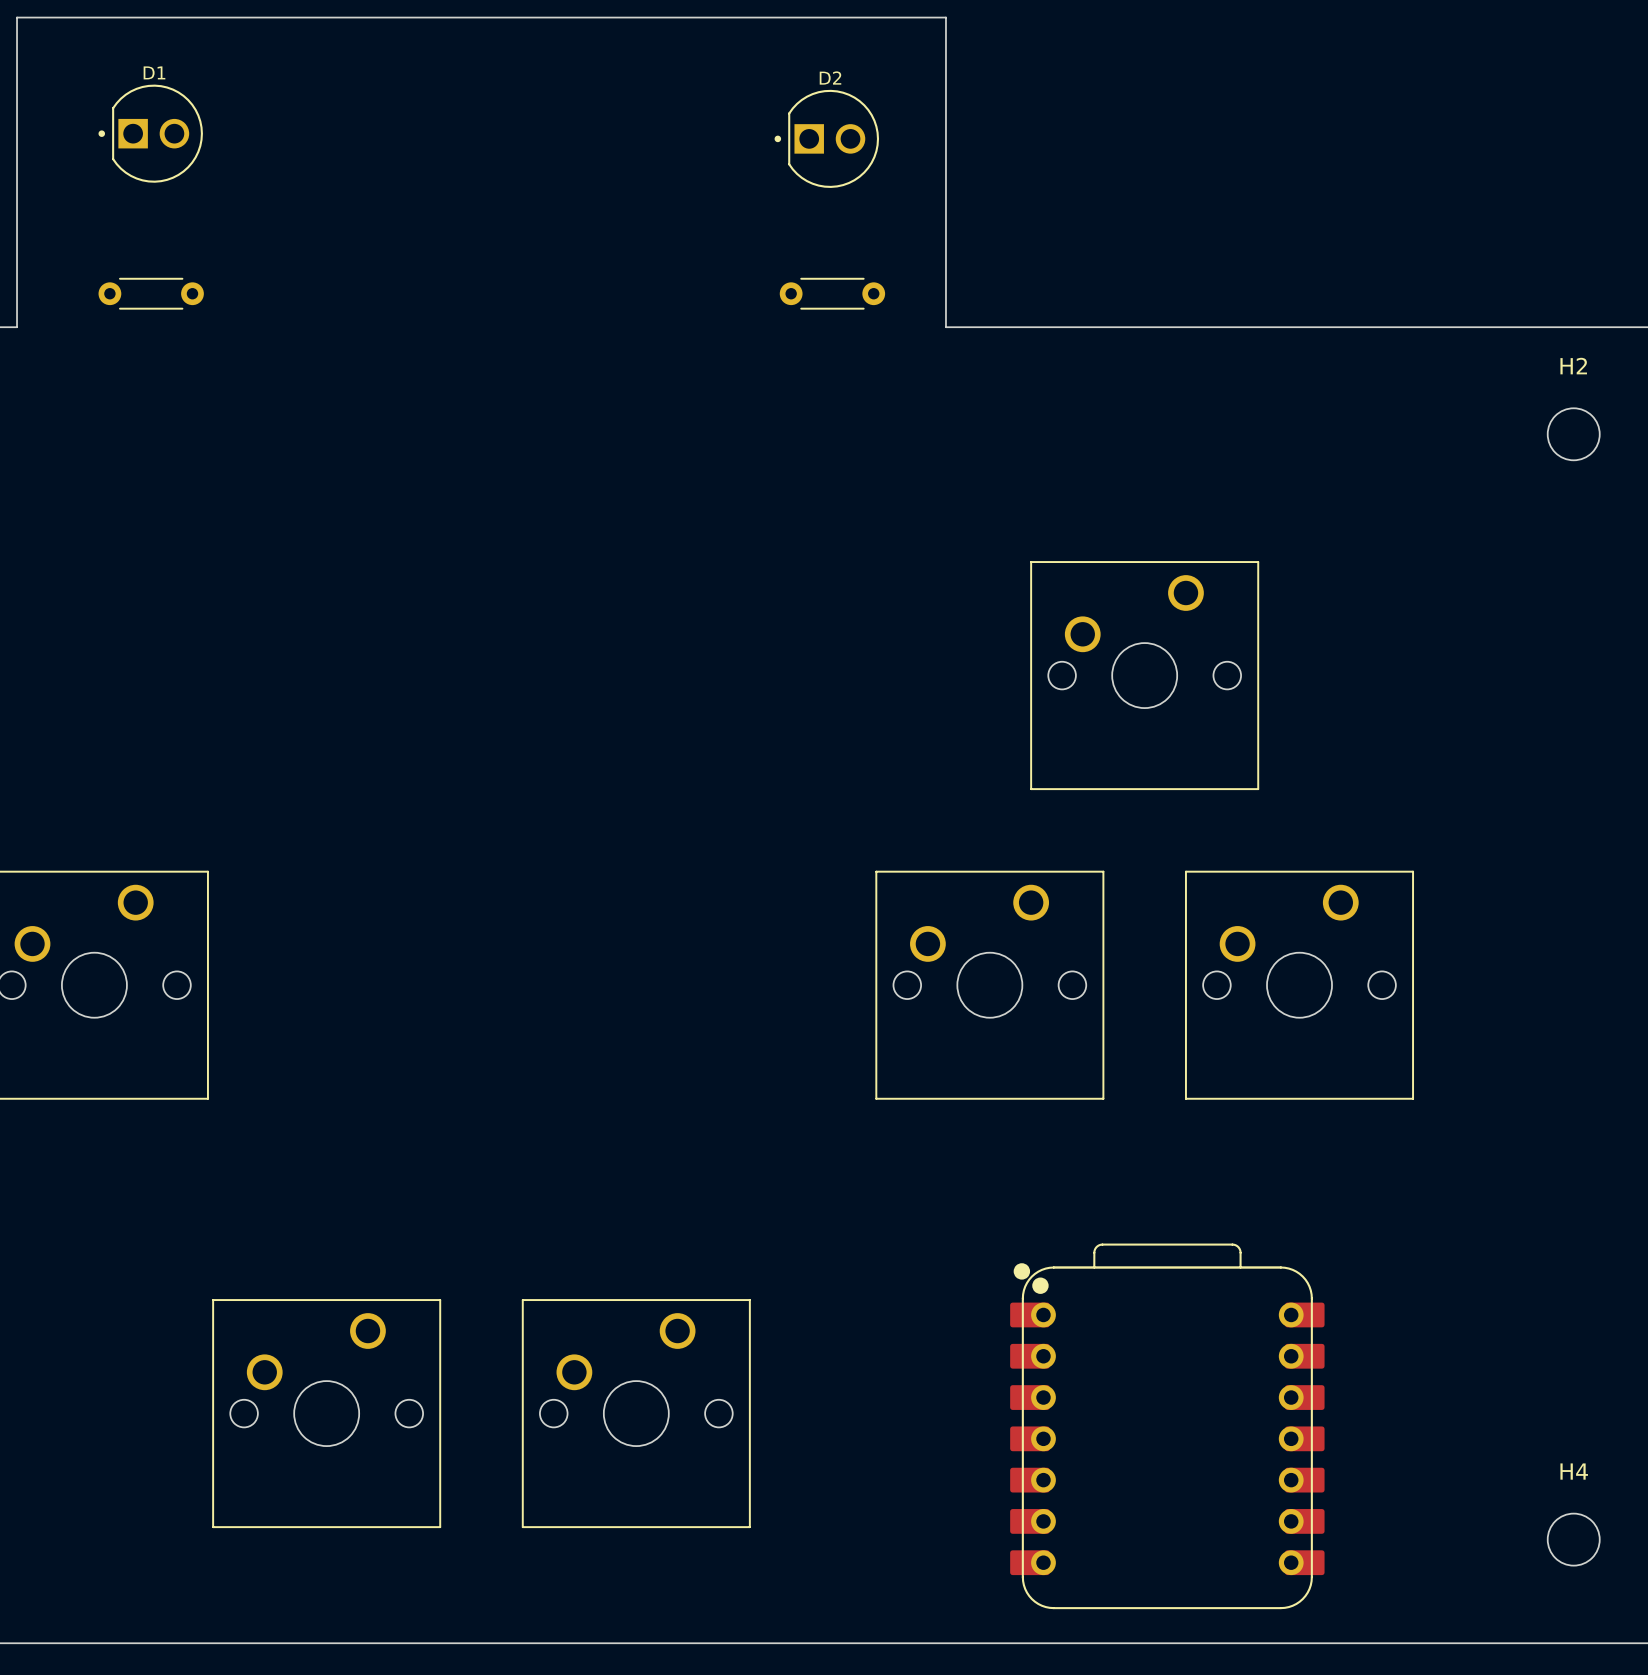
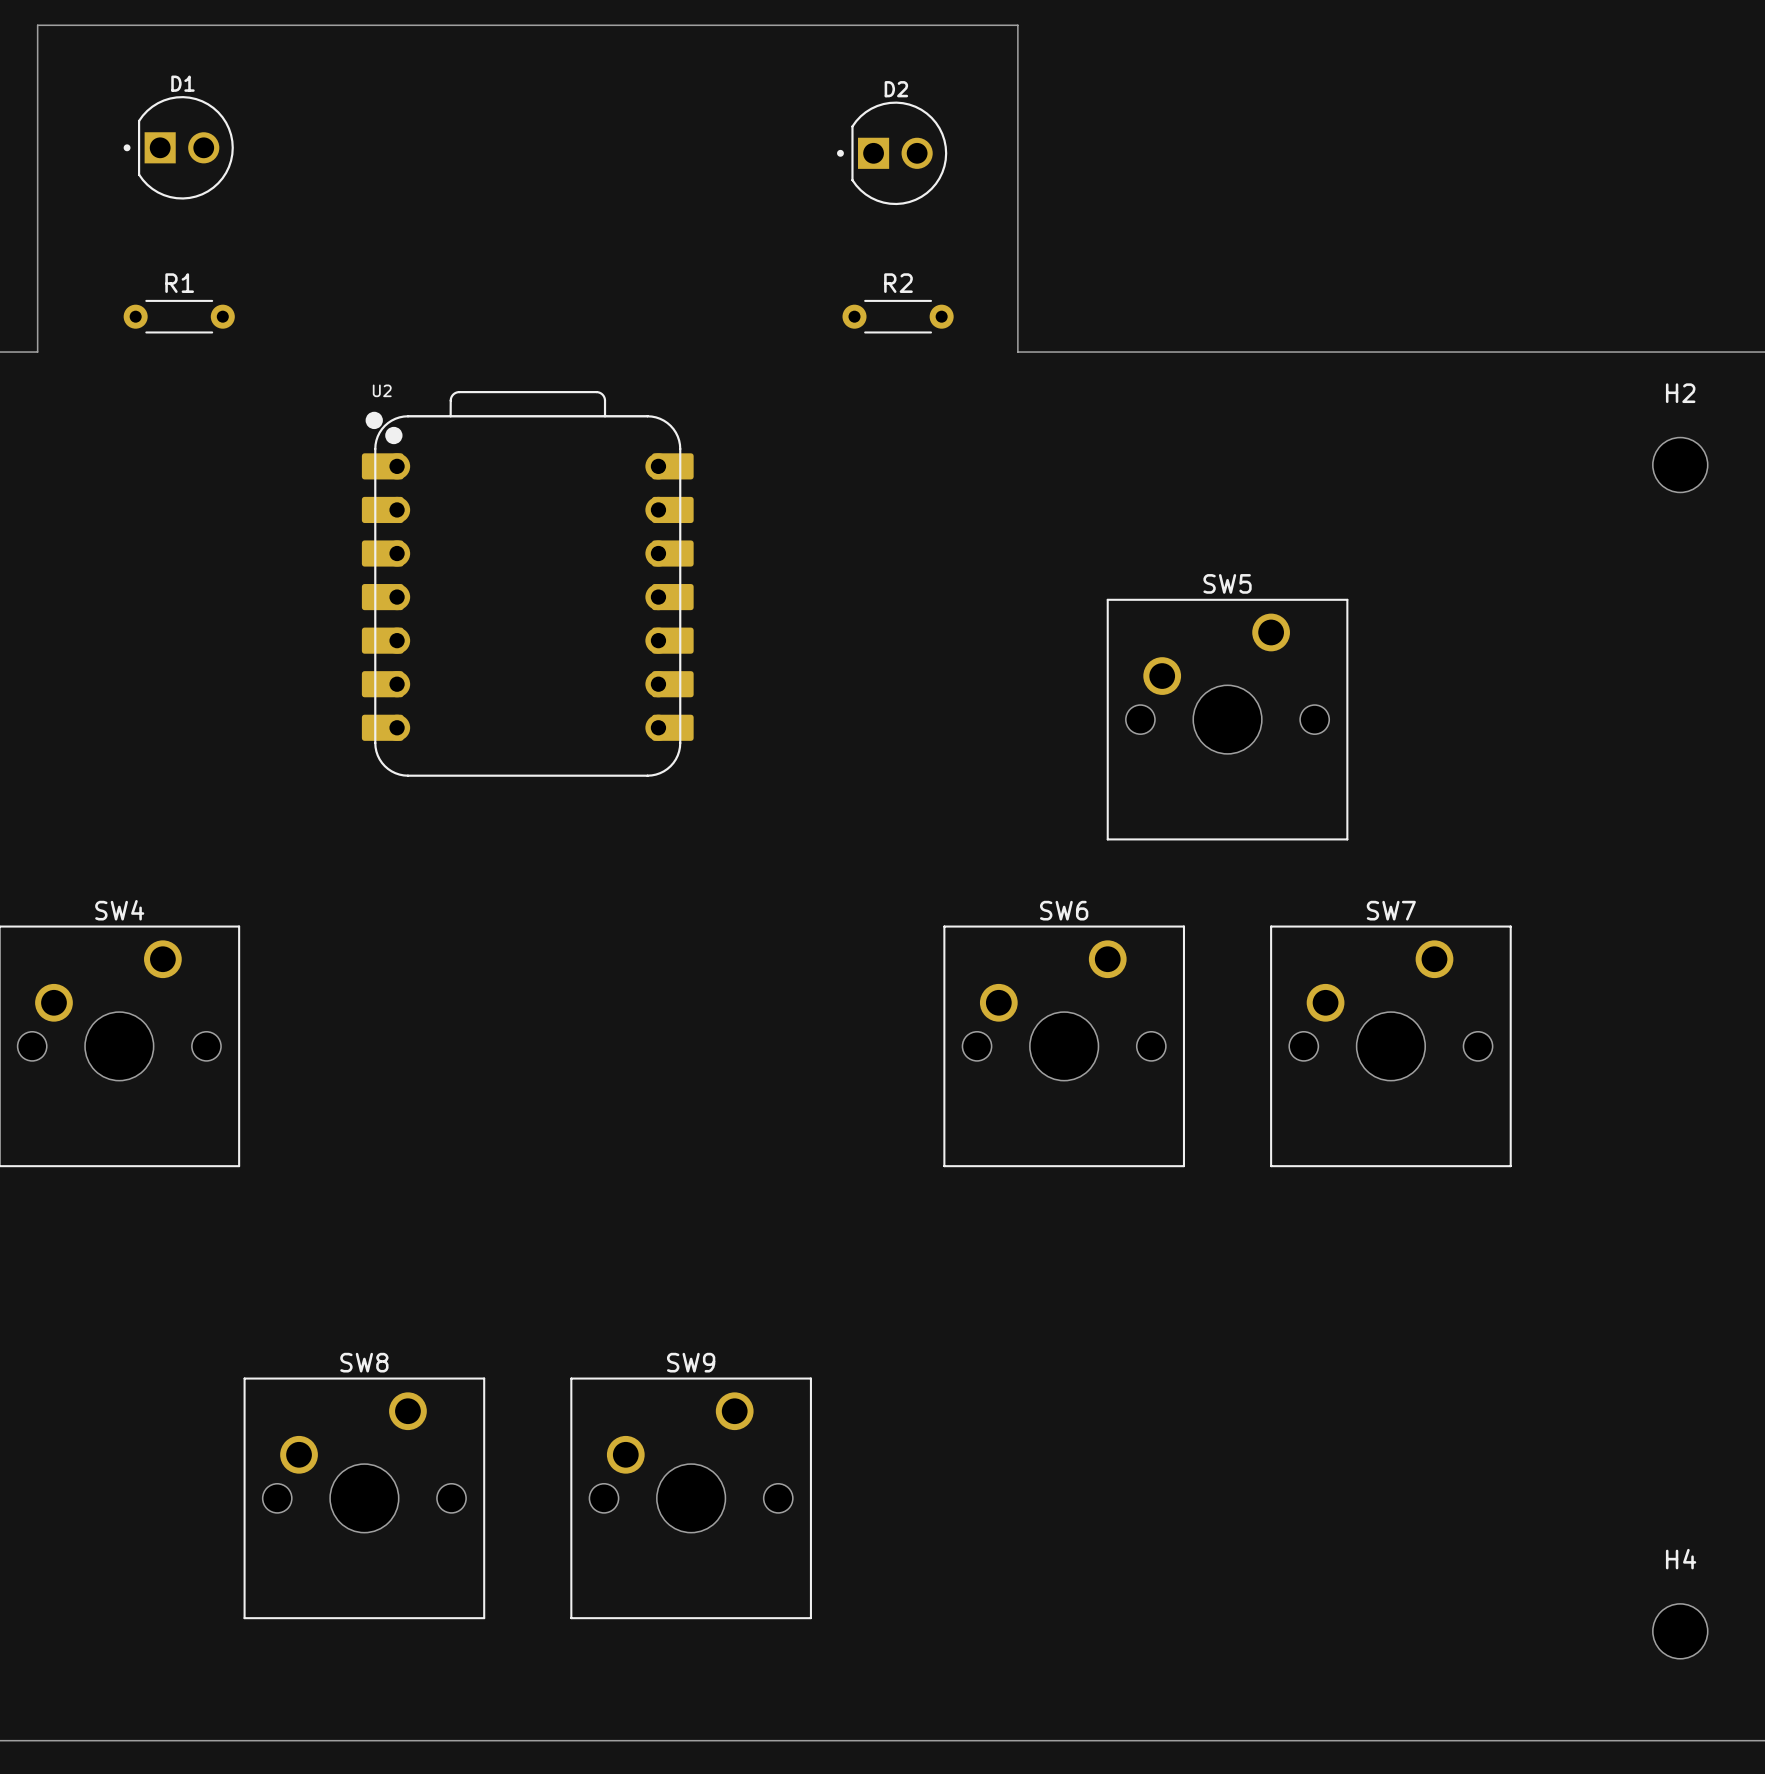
R1 name: none -> R1 (179, 283)
R2 name: none -> R2 (898, 283)
U2: none -> (527, 583)
SW5 name: none -> SW5 (1227, 583)
SW4 name: none -> SW4 (119, 910)
SW6 name: none -> SW6 (1064, 910)
SW7 name: none -> SW7 (1391, 910)
SW8 name: none -> SW8 (364, 1362)
SW9 name: none -> SW9 (691, 1362)
part: (1167, 1426) -> none

